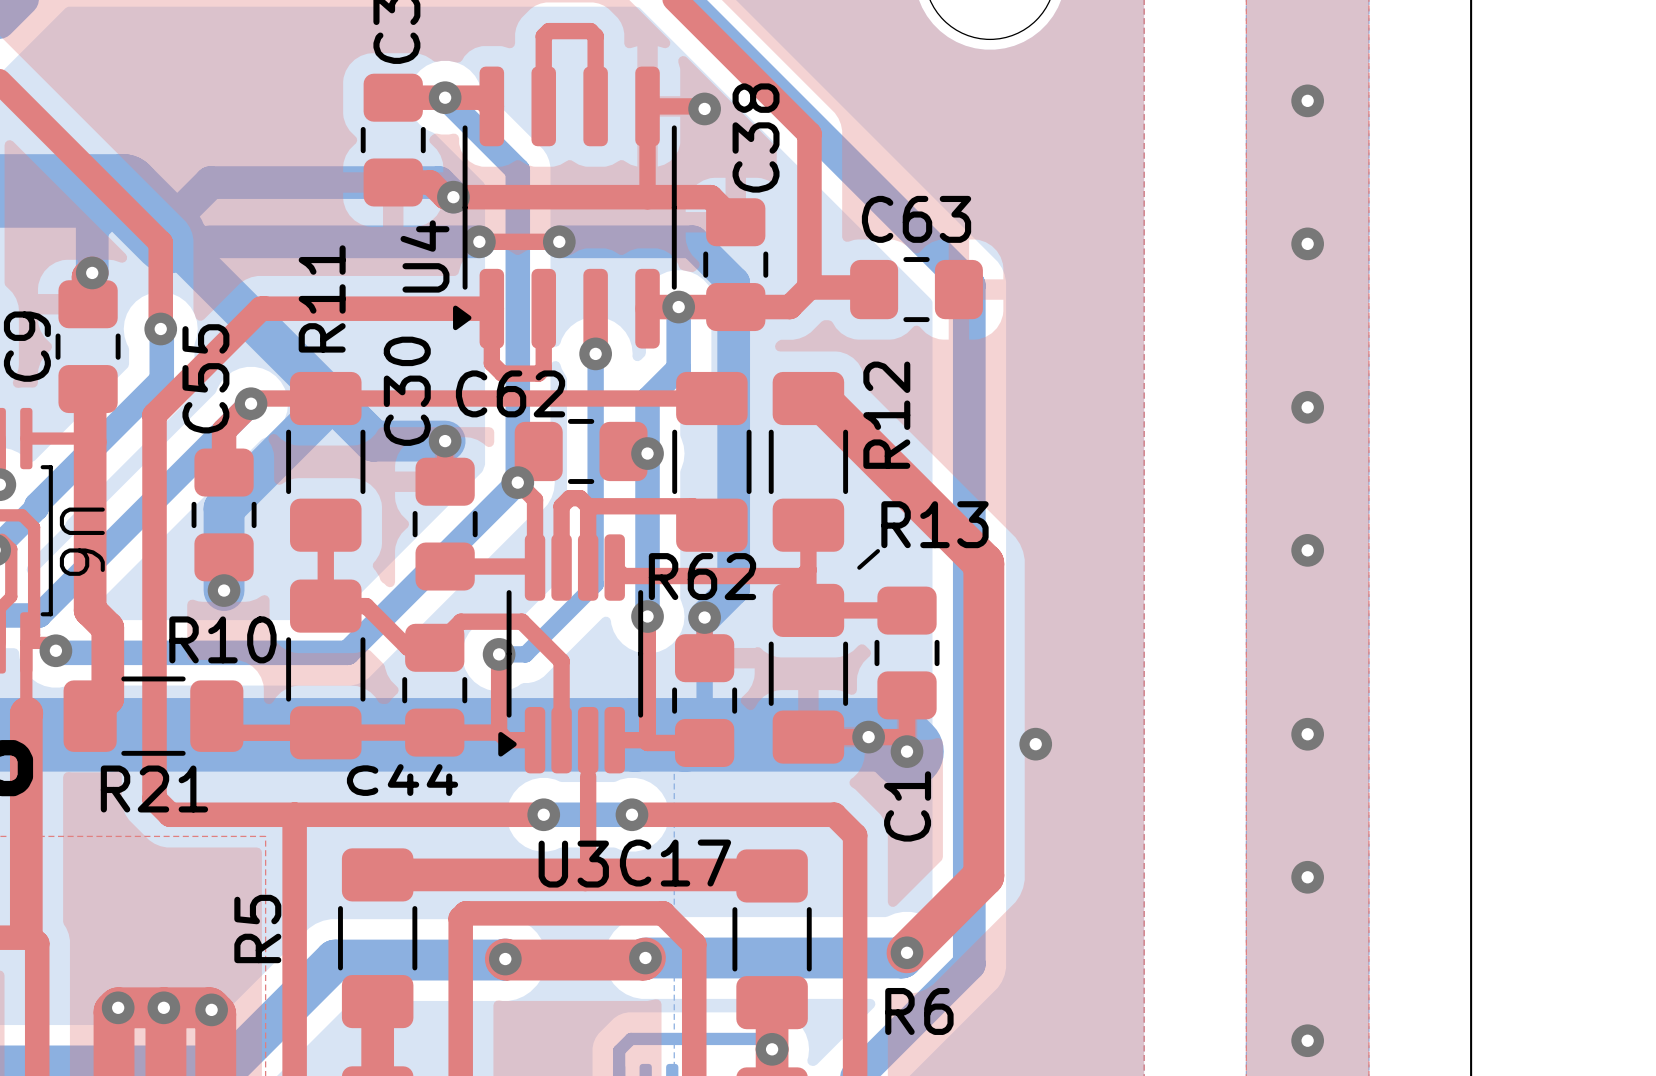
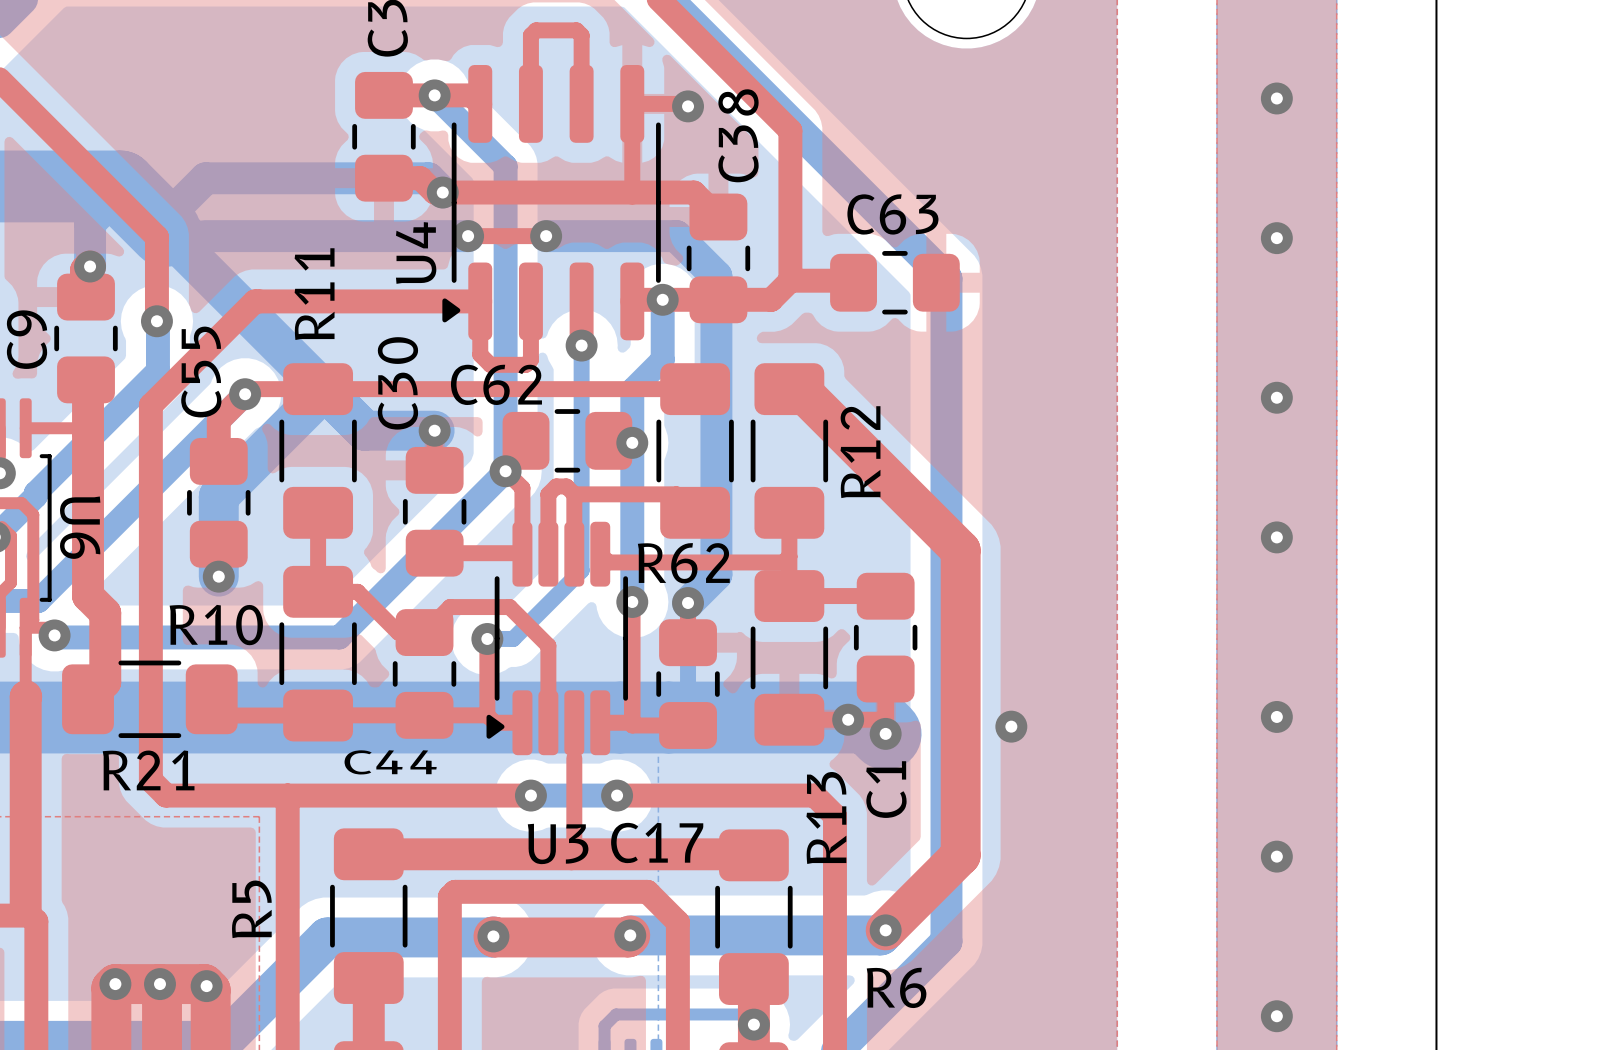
R12 name position: R12 (886, 415) -> R12 (860, 452)
R13 name rotation: 0° (934, 524) -> 90° counterclockwise (826, 817)
R13 name position: R13 (934, 524) -> R13 (826, 817)
line: (877, 551) (859, 567) -> none

